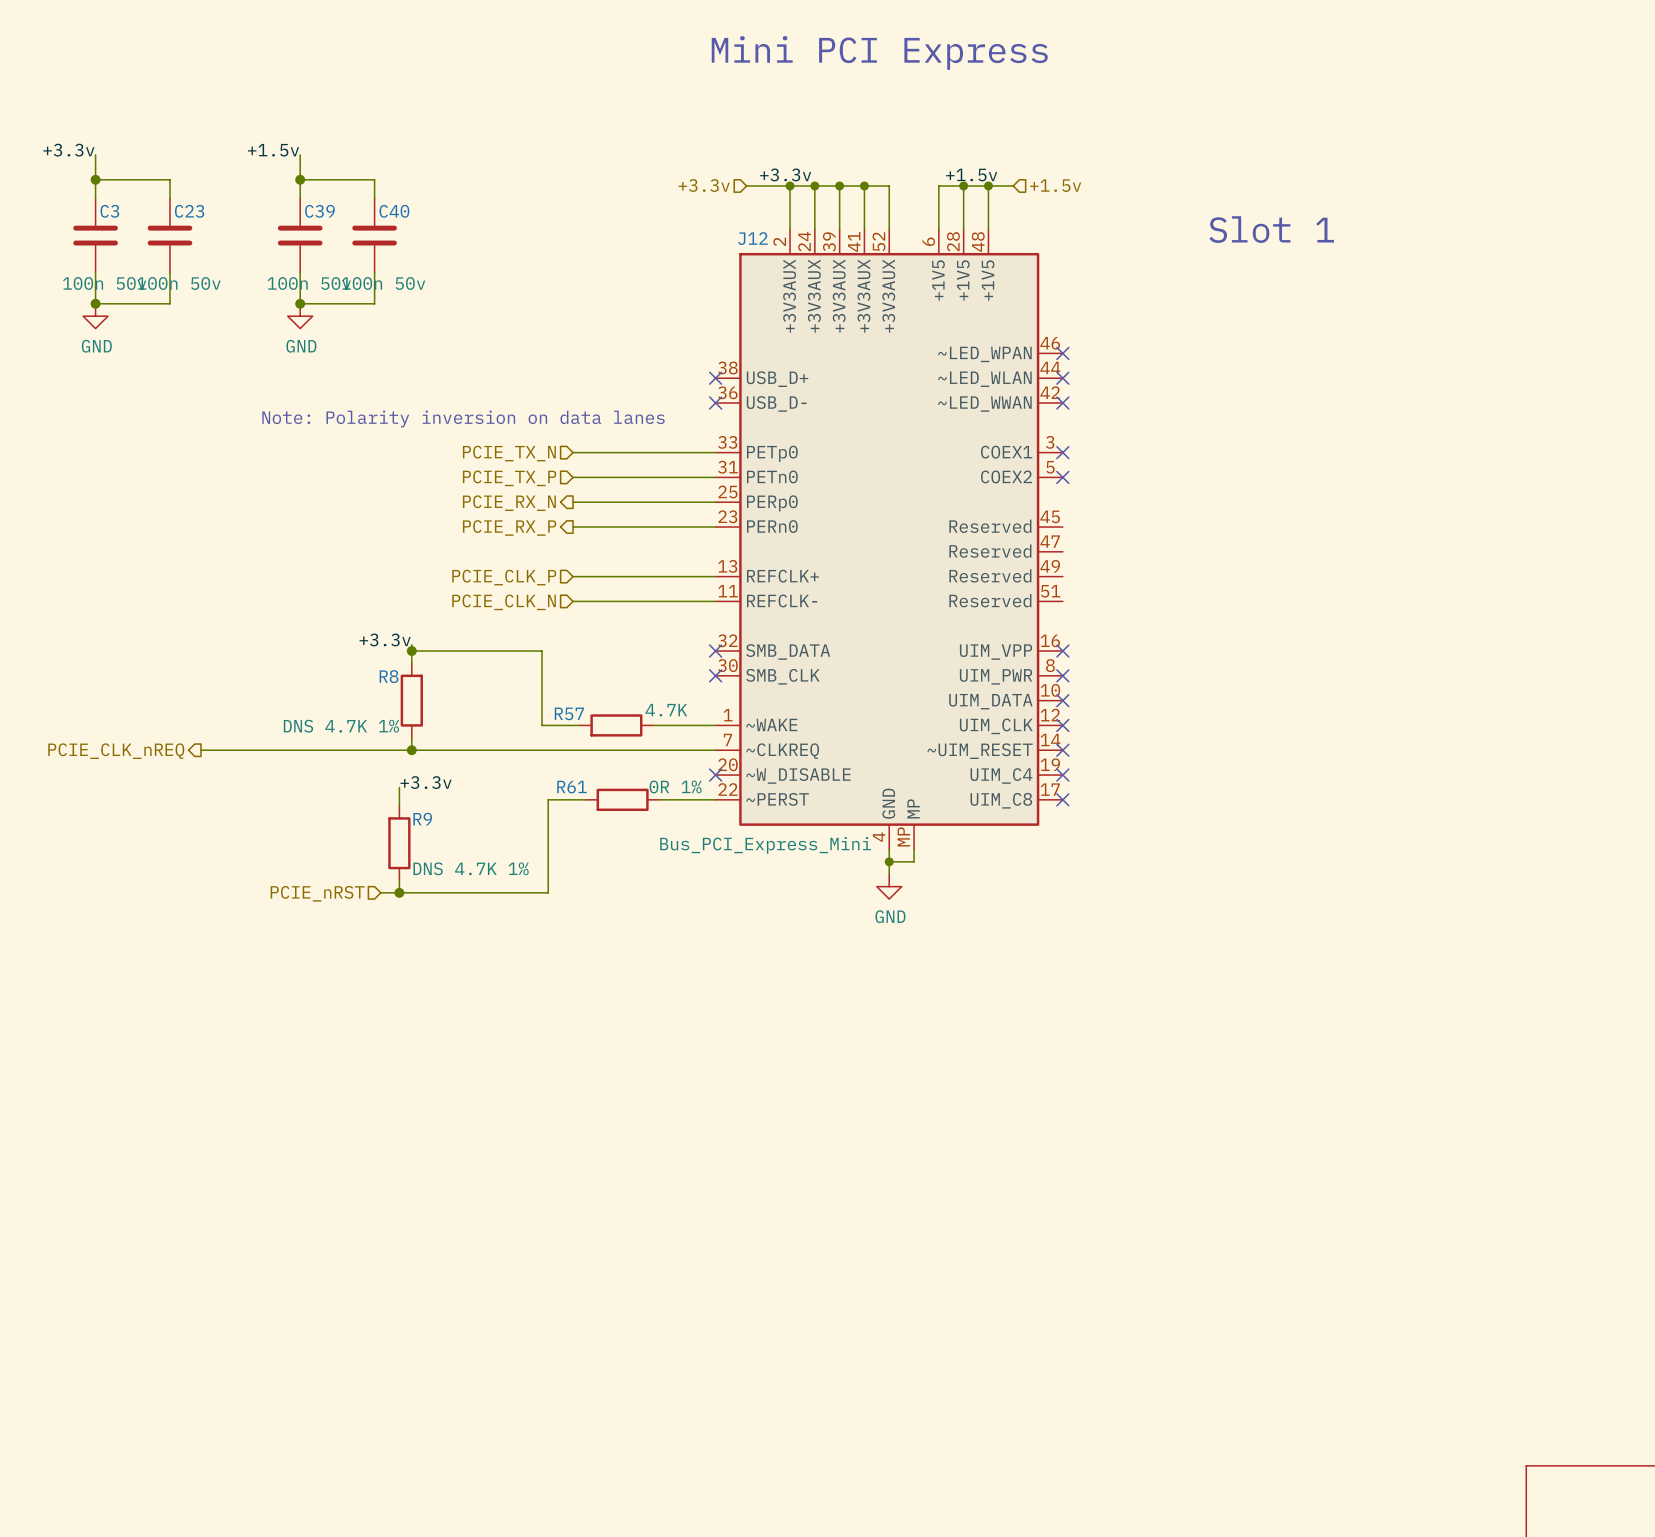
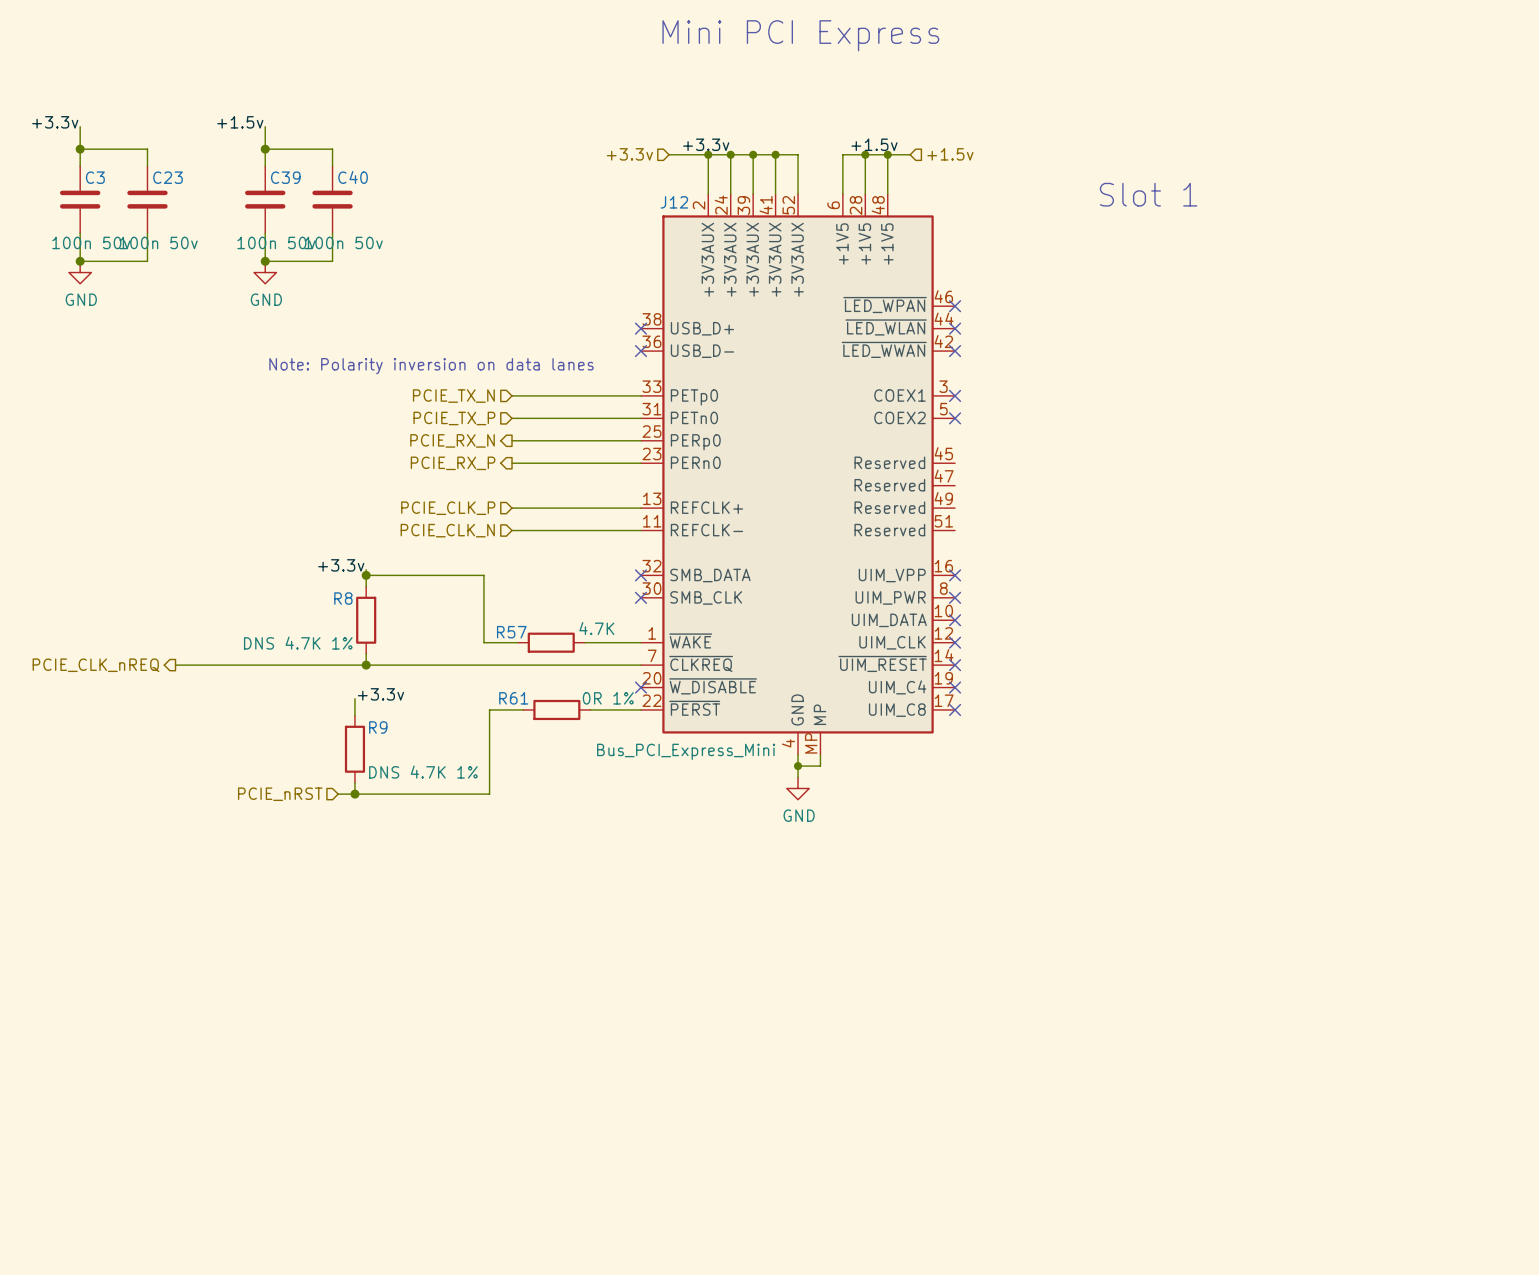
J12 pin name: ~LED_WPAN (984, 354) -> ~{LED_WPAN} (885, 305)
J12 pin name: ~LED_WLAN (984, 379) -> ~{LED_WLAN} (886, 327)
J12 pin name: ~LED_WWAN (984, 404) -> ~{LED_WWAN} (884, 349)
J12 pin name: ~WAKE (771, 724) -> ~{WAKE} (690, 640)
J12 pin name: ~CLKREQ (782, 751) -> ~{CLKREQ} (701, 663)
J12 pin name: ~UIM_RESET (980, 751) -> ~{UIM_RESET} (882, 663)
J12 pin name: ~W_DISABLE (798, 775) -> ~{W_DISABLE} (713, 686)
J12 pin name: ~PERST (777, 799) -> ~{PERST} (694, 708)

